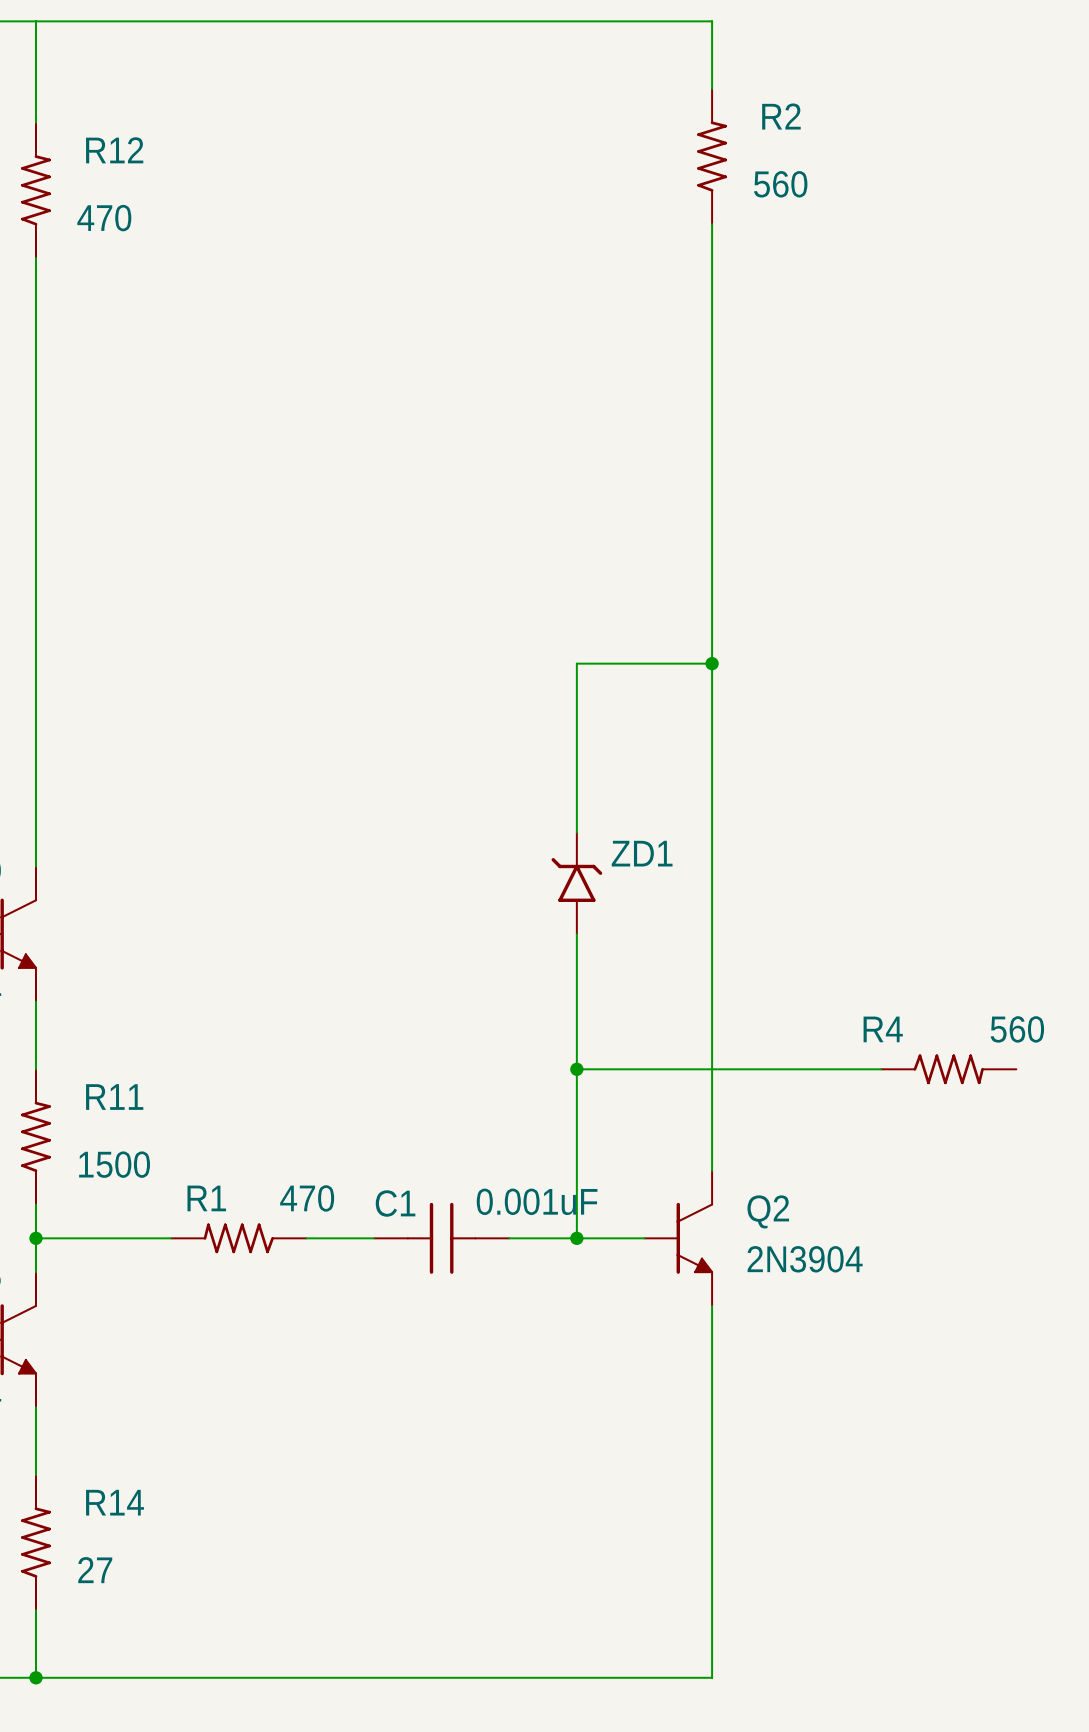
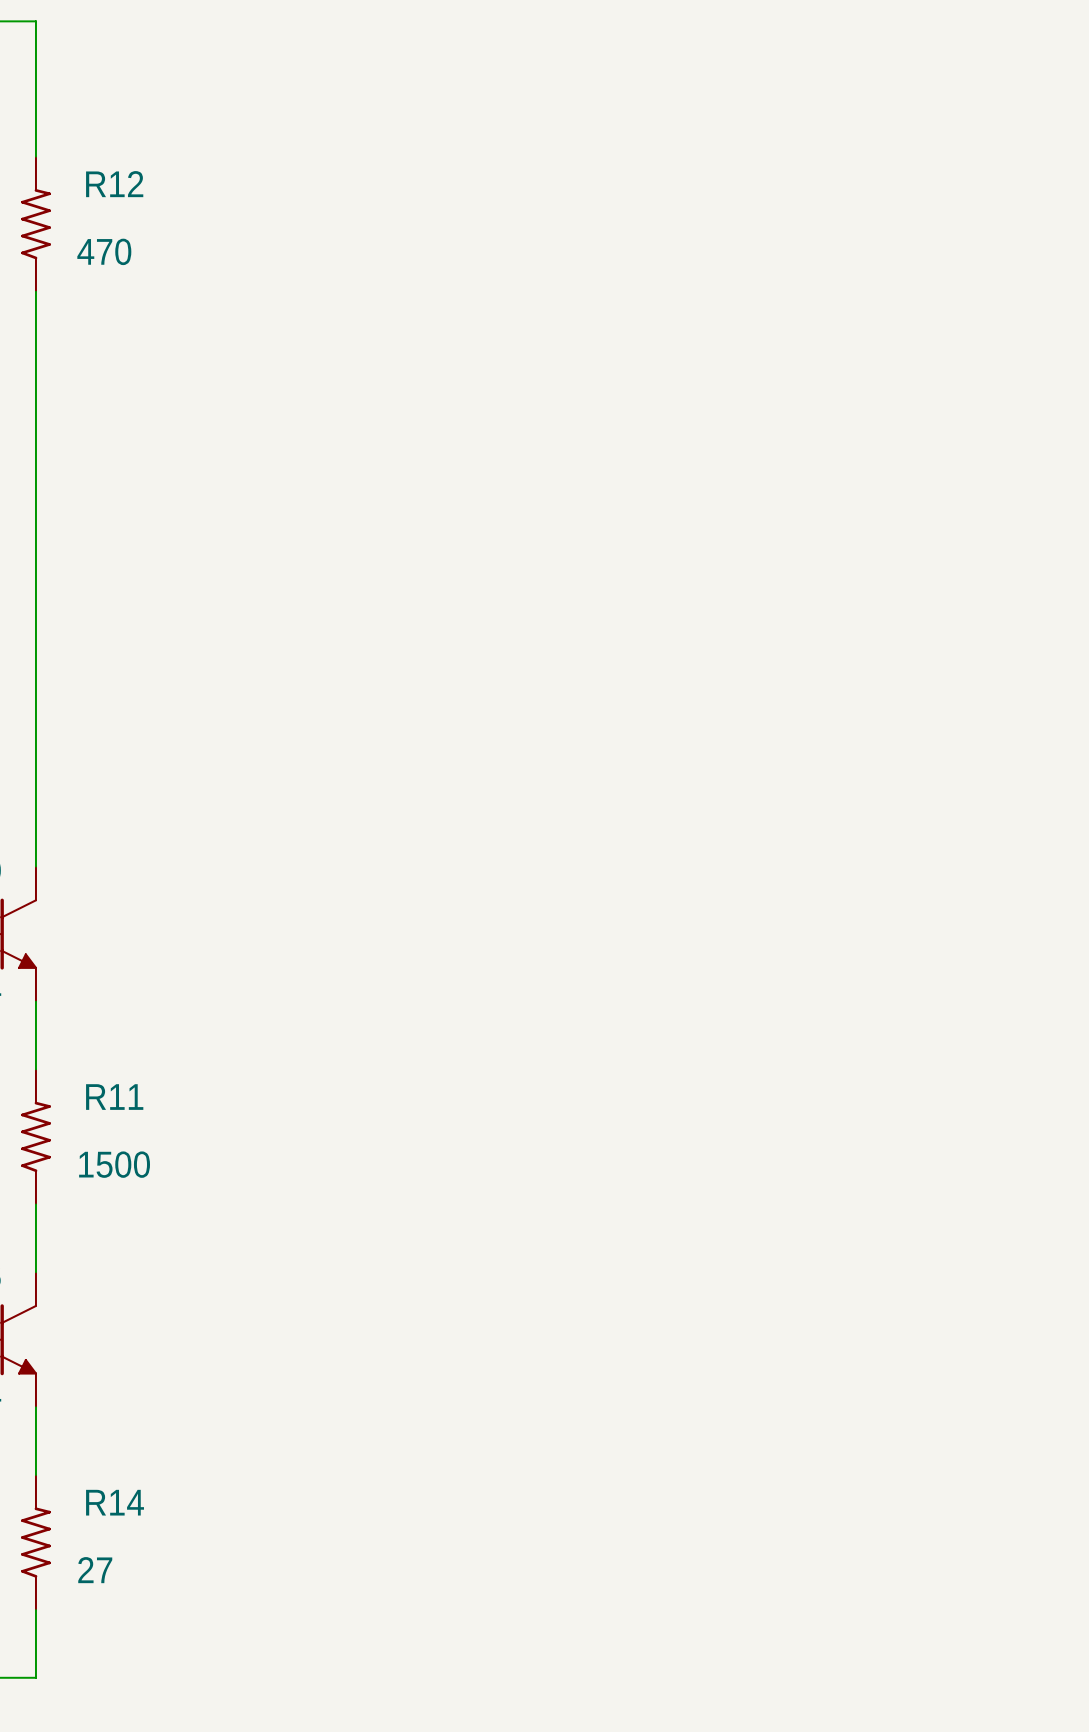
wire: (35, 21) (712, 21) (712, 88) -> none
R2: 560 (712, 156) -> none
R12 position: (35, 190) -> (35, 224)
wire: (712, 224) (712, 1170) -> none
wire: (712, 663) (576, 663) (576, 832) -> none
junction: (712, 663) -> none
ZD1: (576, 883) -> none
wire: (576, 934) (576, 1238) -> none
wire: (576, 1069) (881, 1069) -> none
junction: (576, 1069) -> none
R4: 560 (948, 1069) -> none
wire: (35, 1238) (171, 1238) -> none
junction: (35, 1238) -> none
R1: 470 (238, 1238) -> none
wire: (306, 1238) (374, 1238) -> none
C1: 0.001uF (441, 1238) -> none
wire: (509, 1238) (644, 1238) -> none
junction: (576, 1238) -> none
Q2: 2N3904 (678, 1238) -> none
wire: (712, 1305) (712, 1677) (35, 1677) -> none
junction: (35, 1677) -> none

